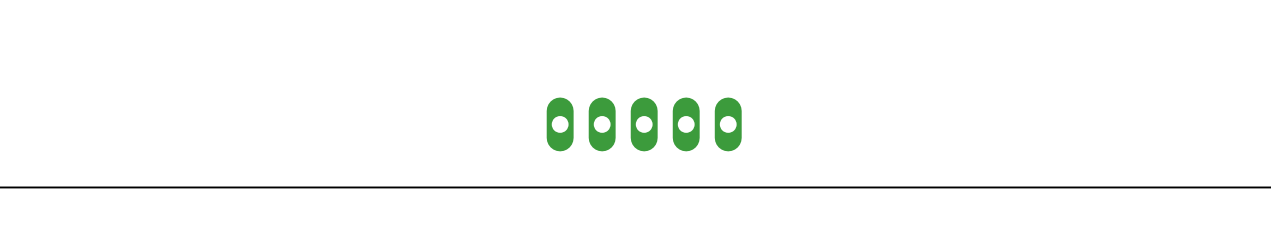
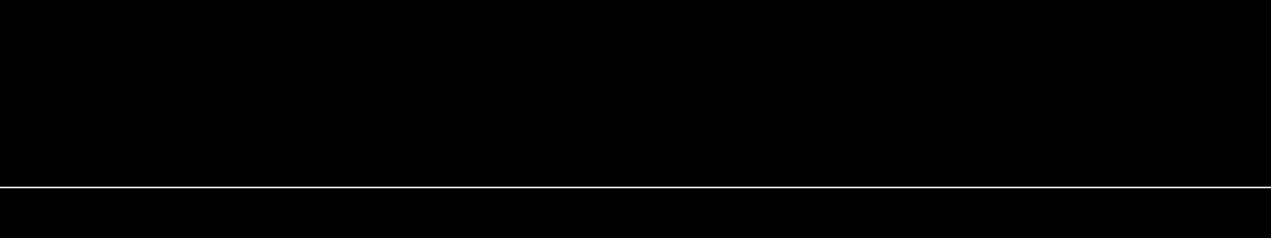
part: (644, 124) -> none

